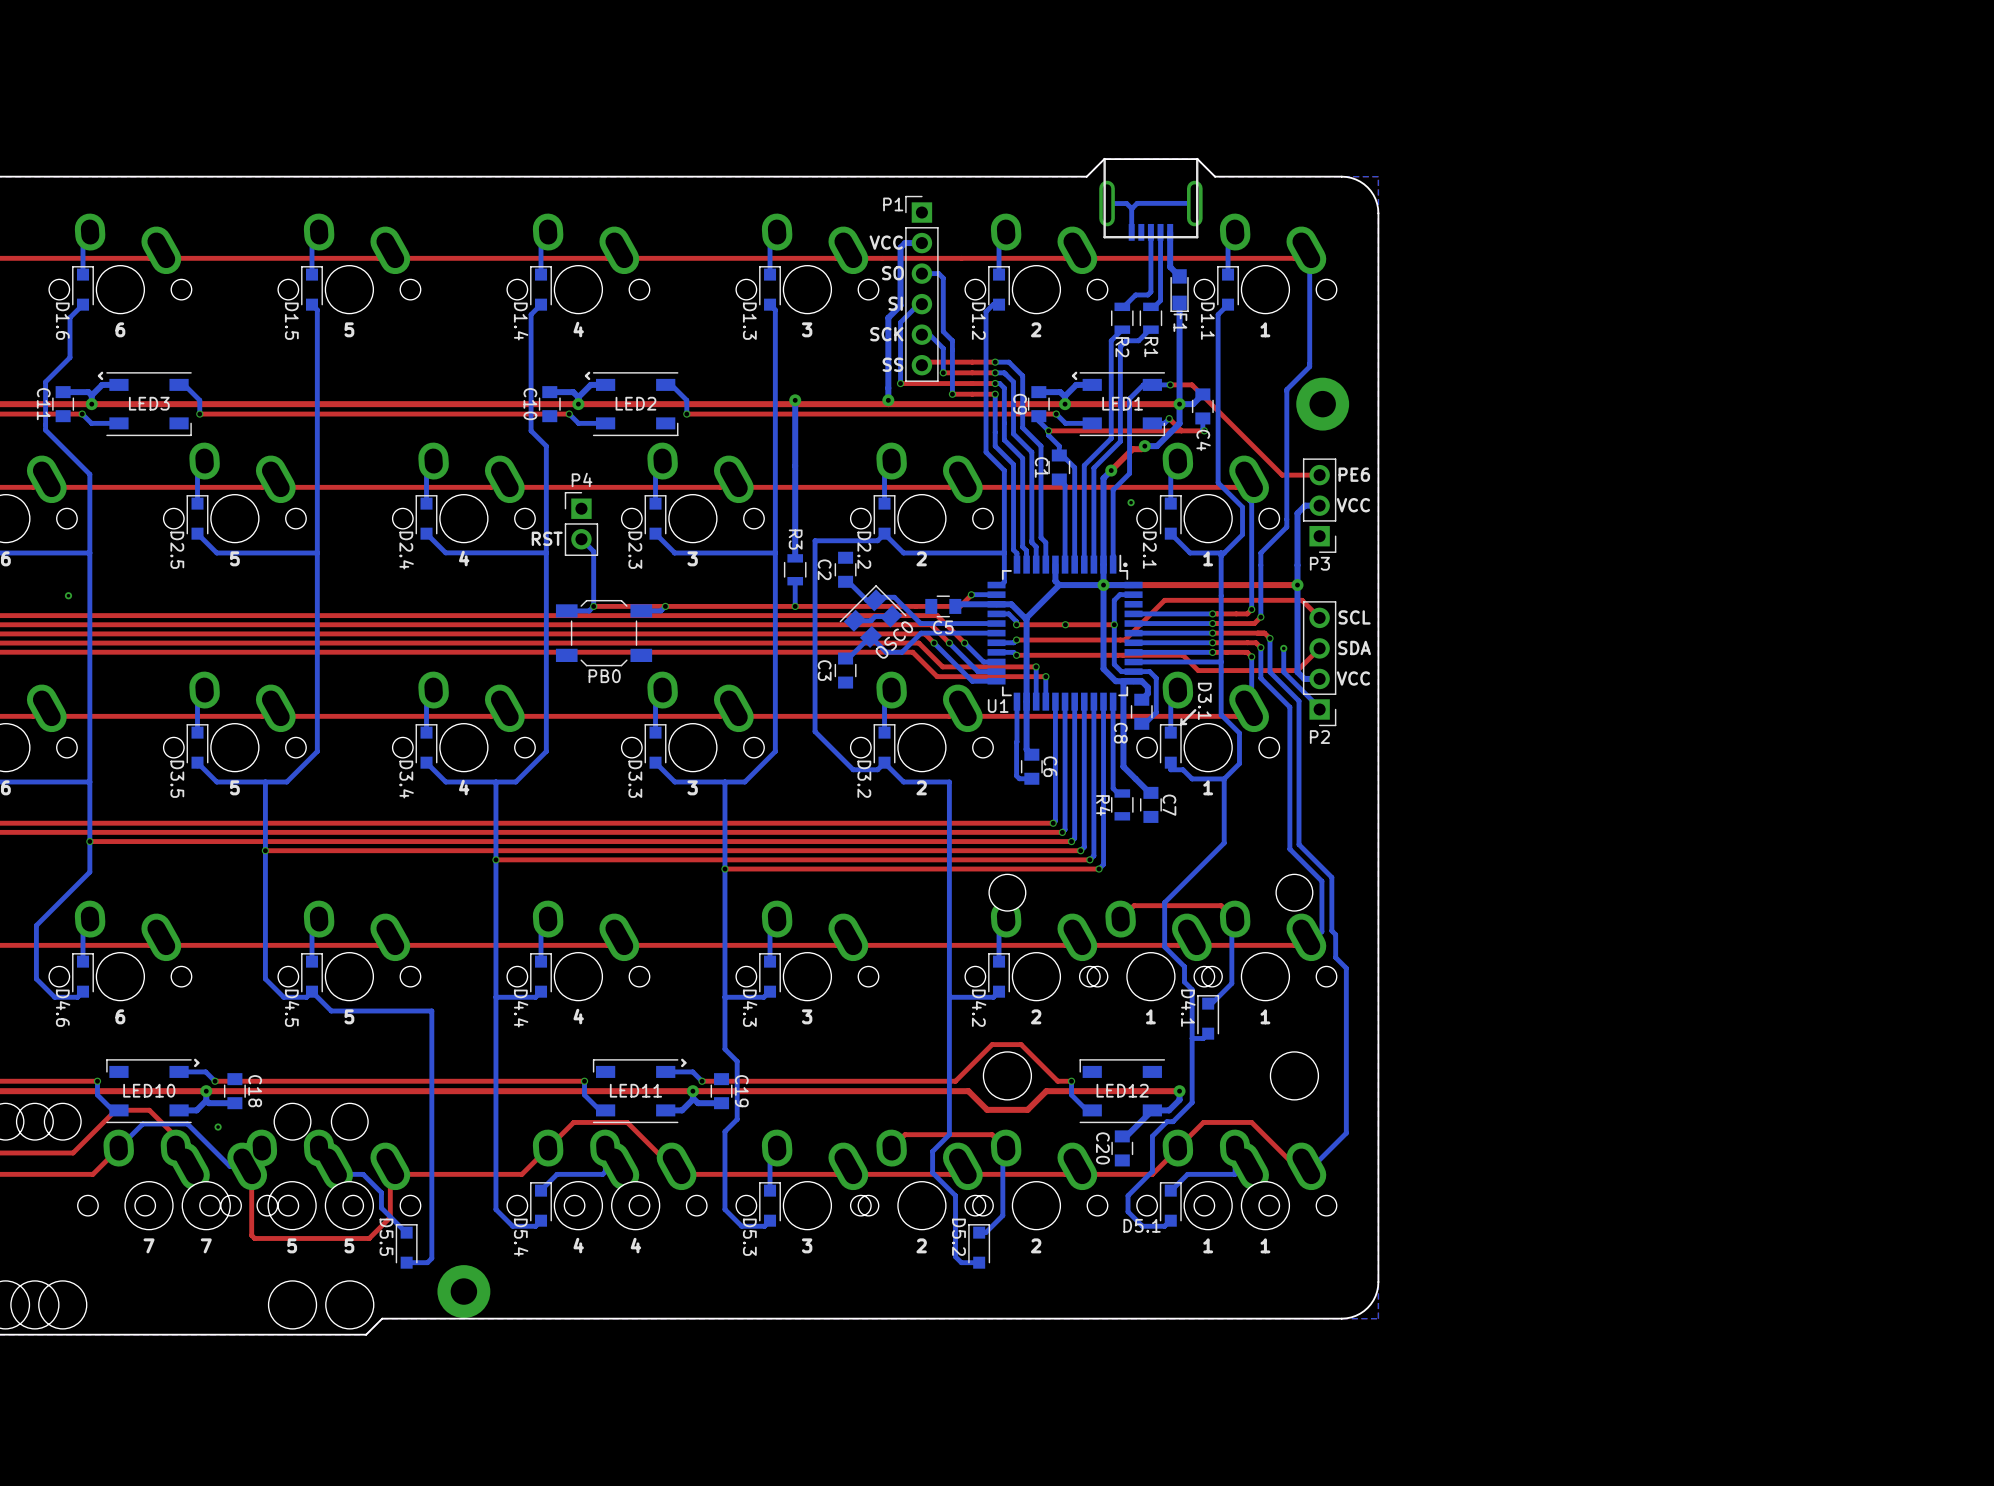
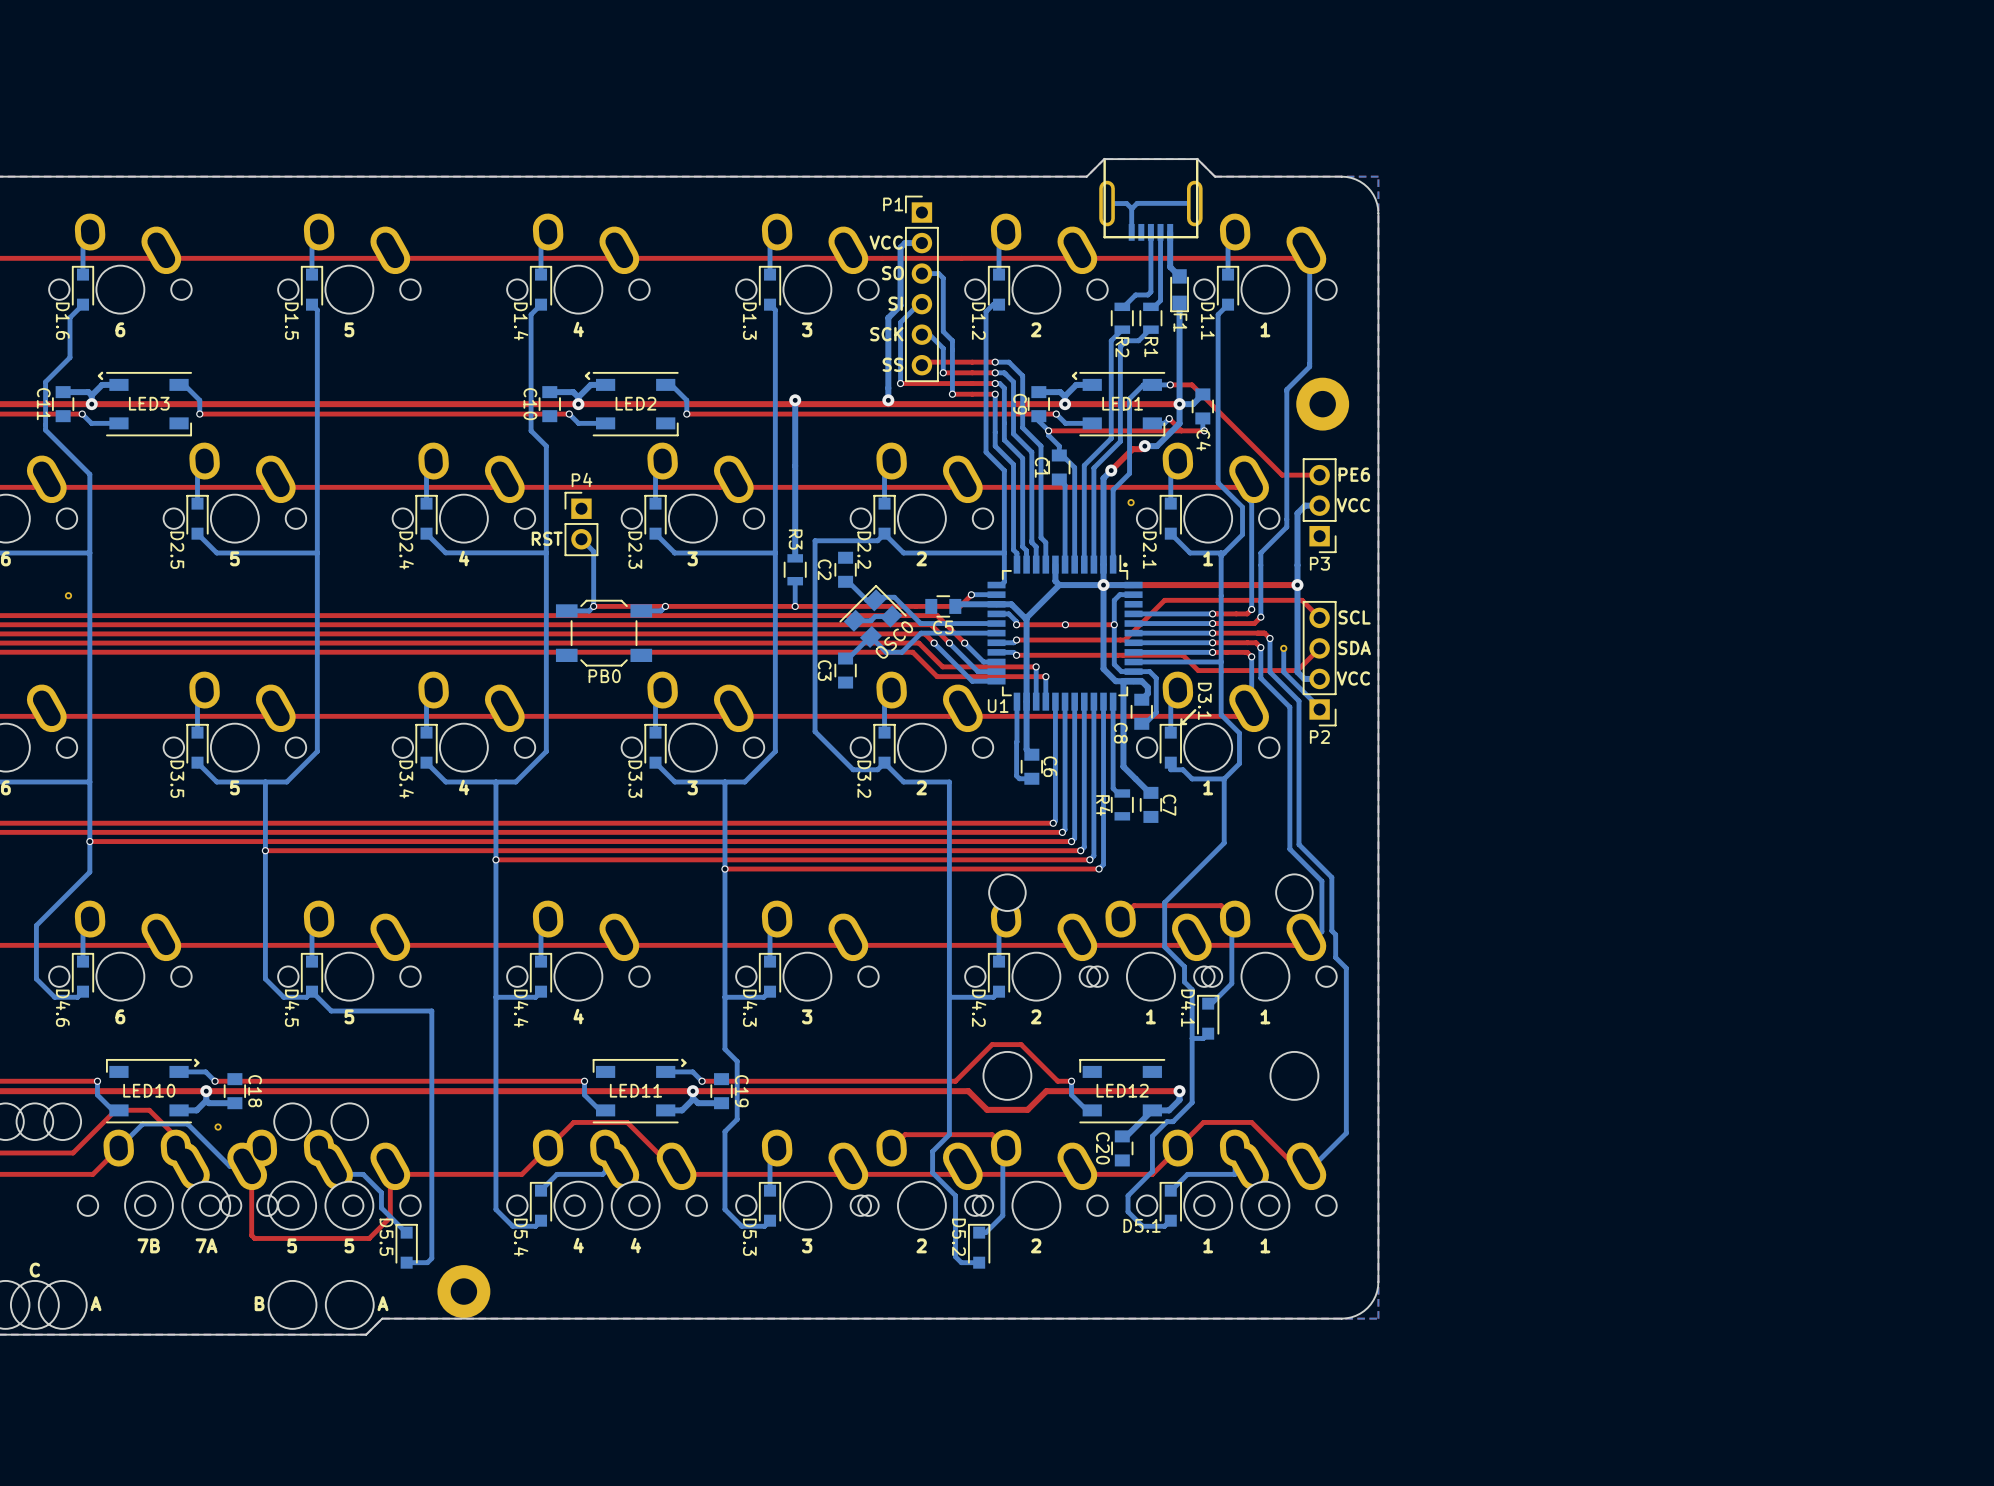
text: 7 (149, 1245) -> 7B (148, 1245)
text: 7 (206, 1245) -> 7A (206, 1245)
text: none -> C (34, 1270)
text: none -> A (95, 1303)
text: none -> B (259, 1303)
text: none -> A (382, 1303)

